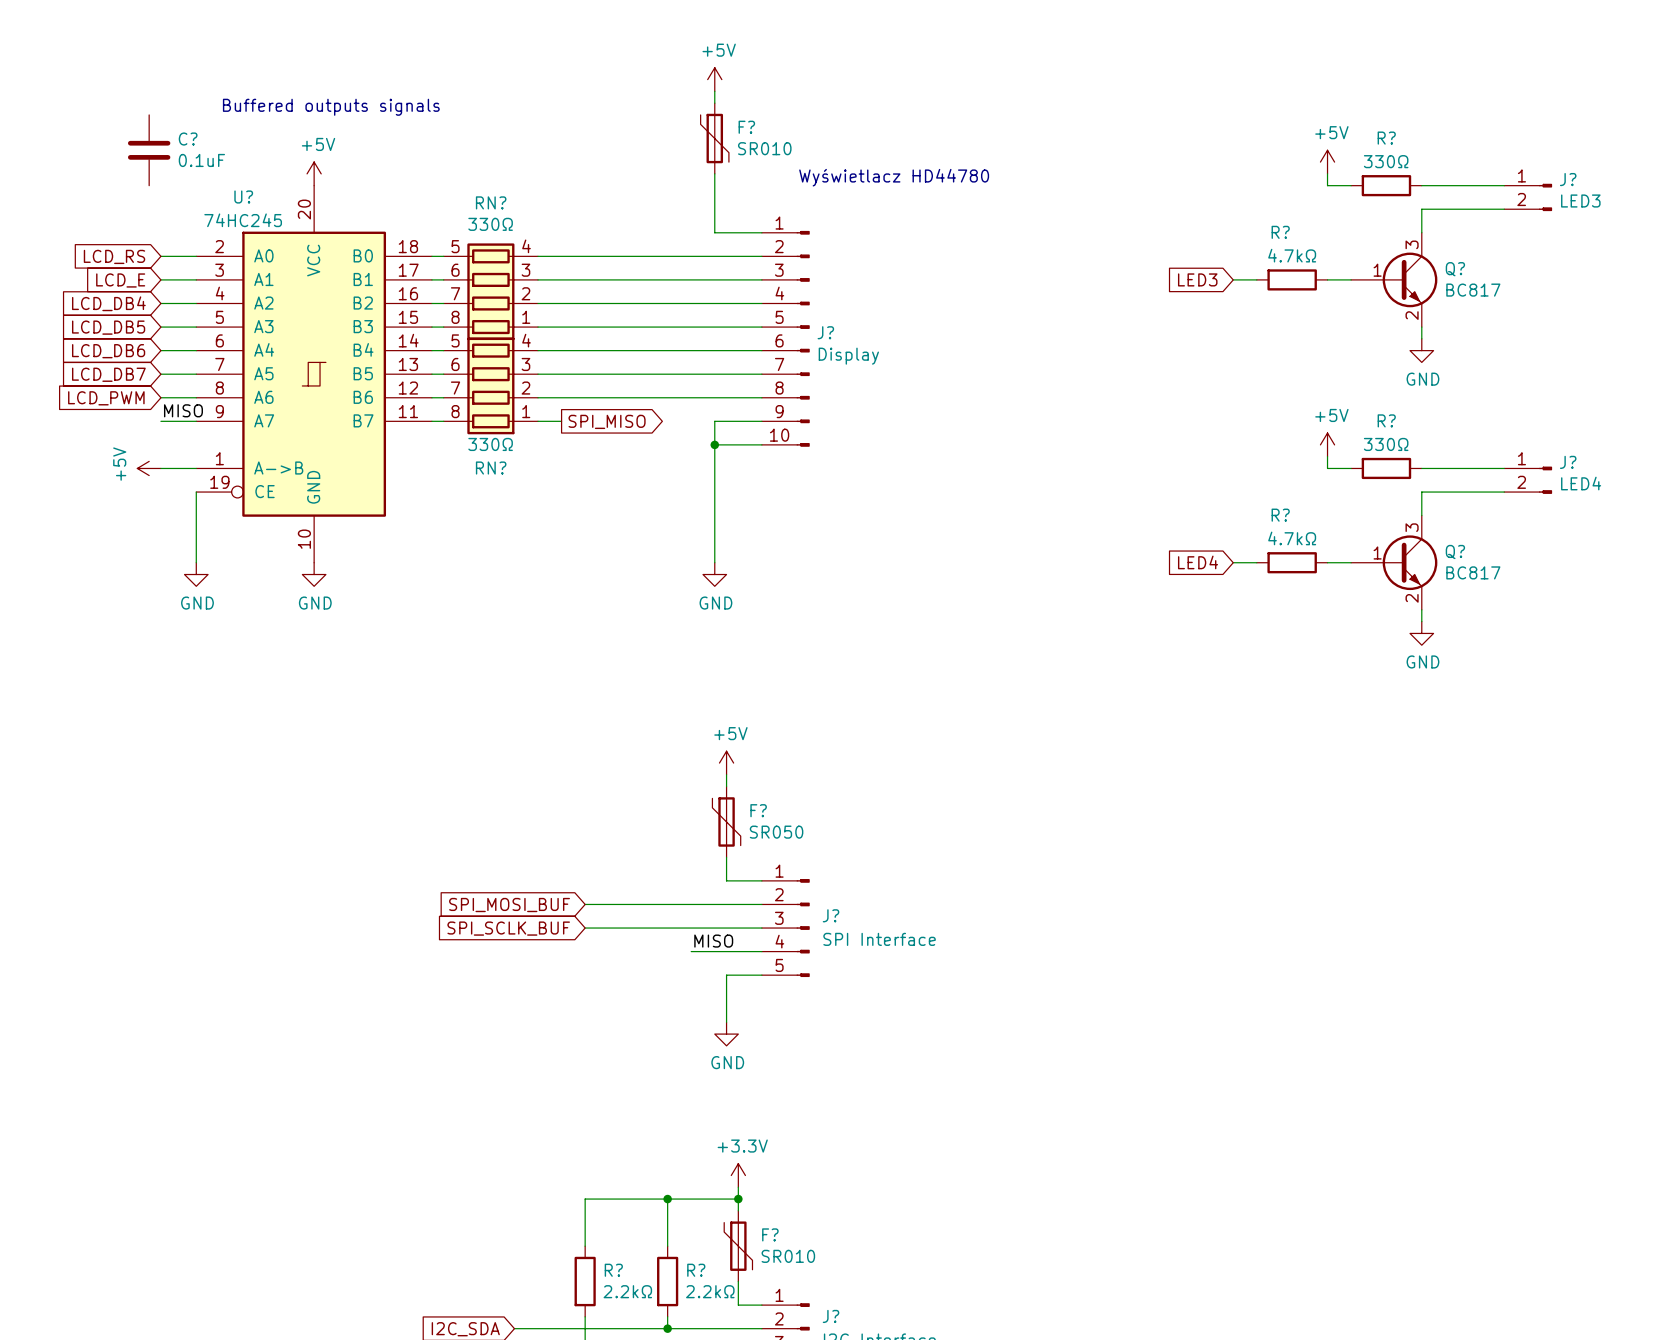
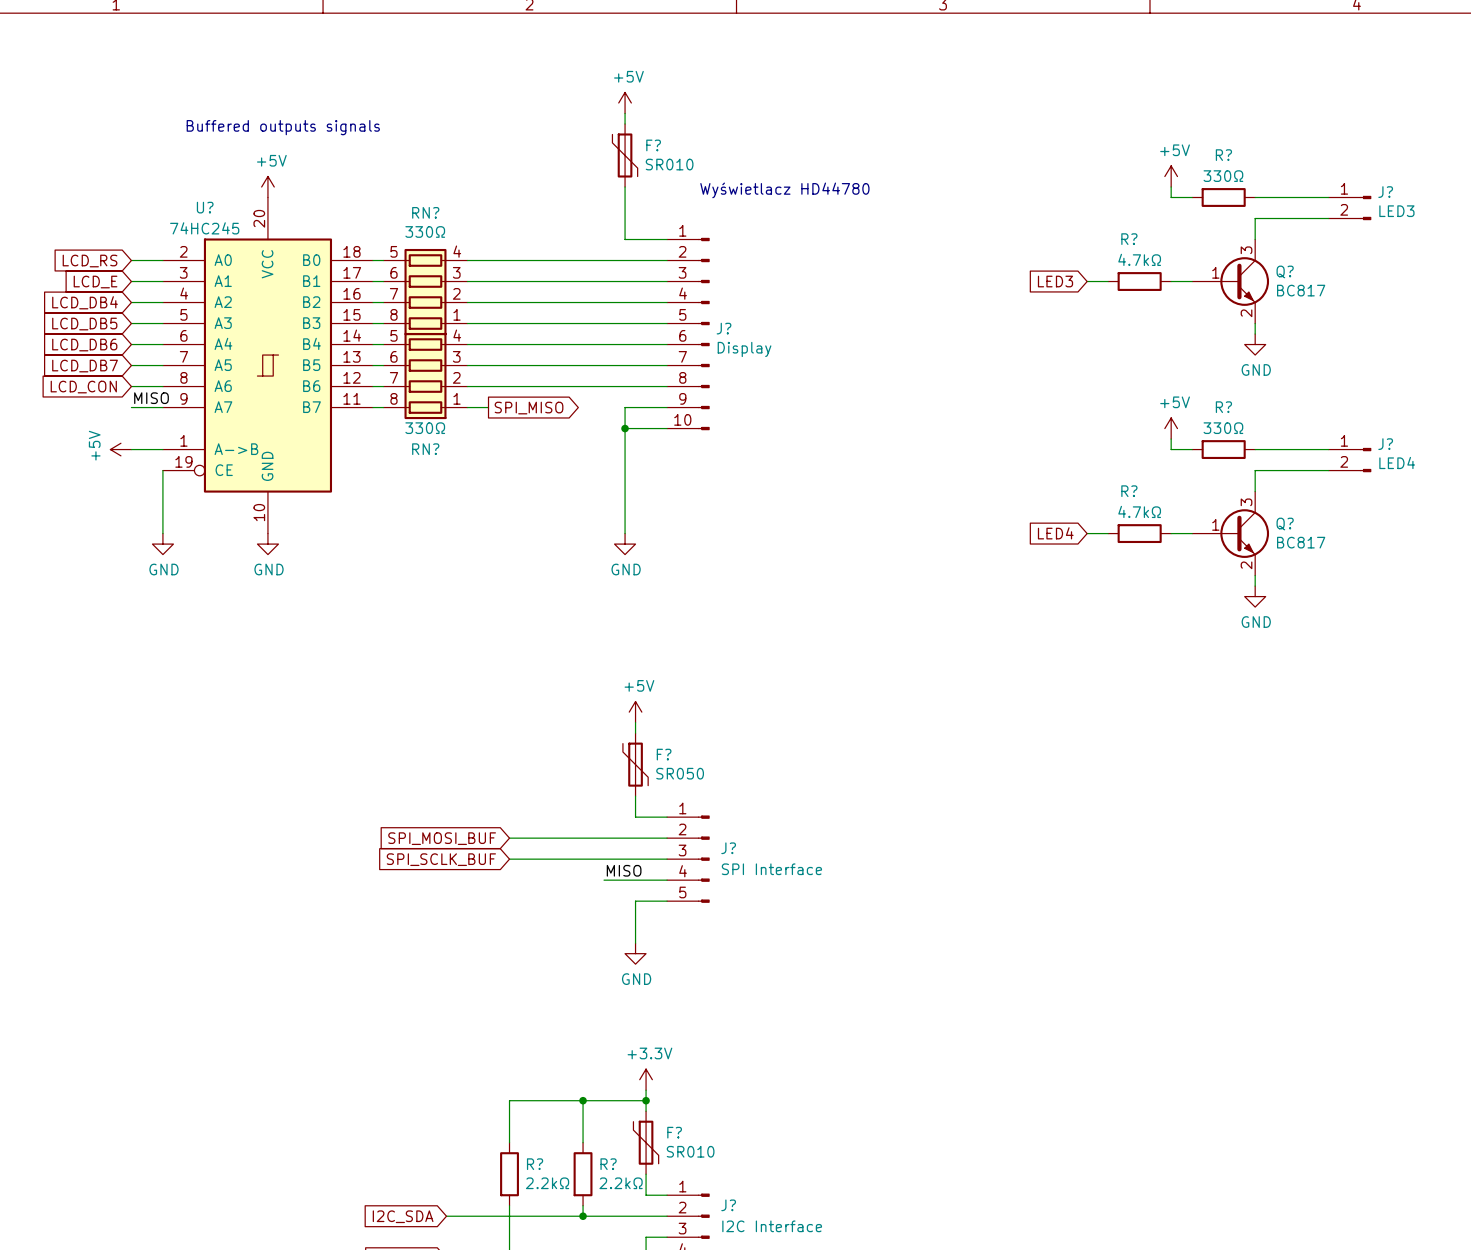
C?: 0.1uF (149, 150) -> none
global label: LCD_PWM (106, 398) -> LCD_CON (83, 387)

